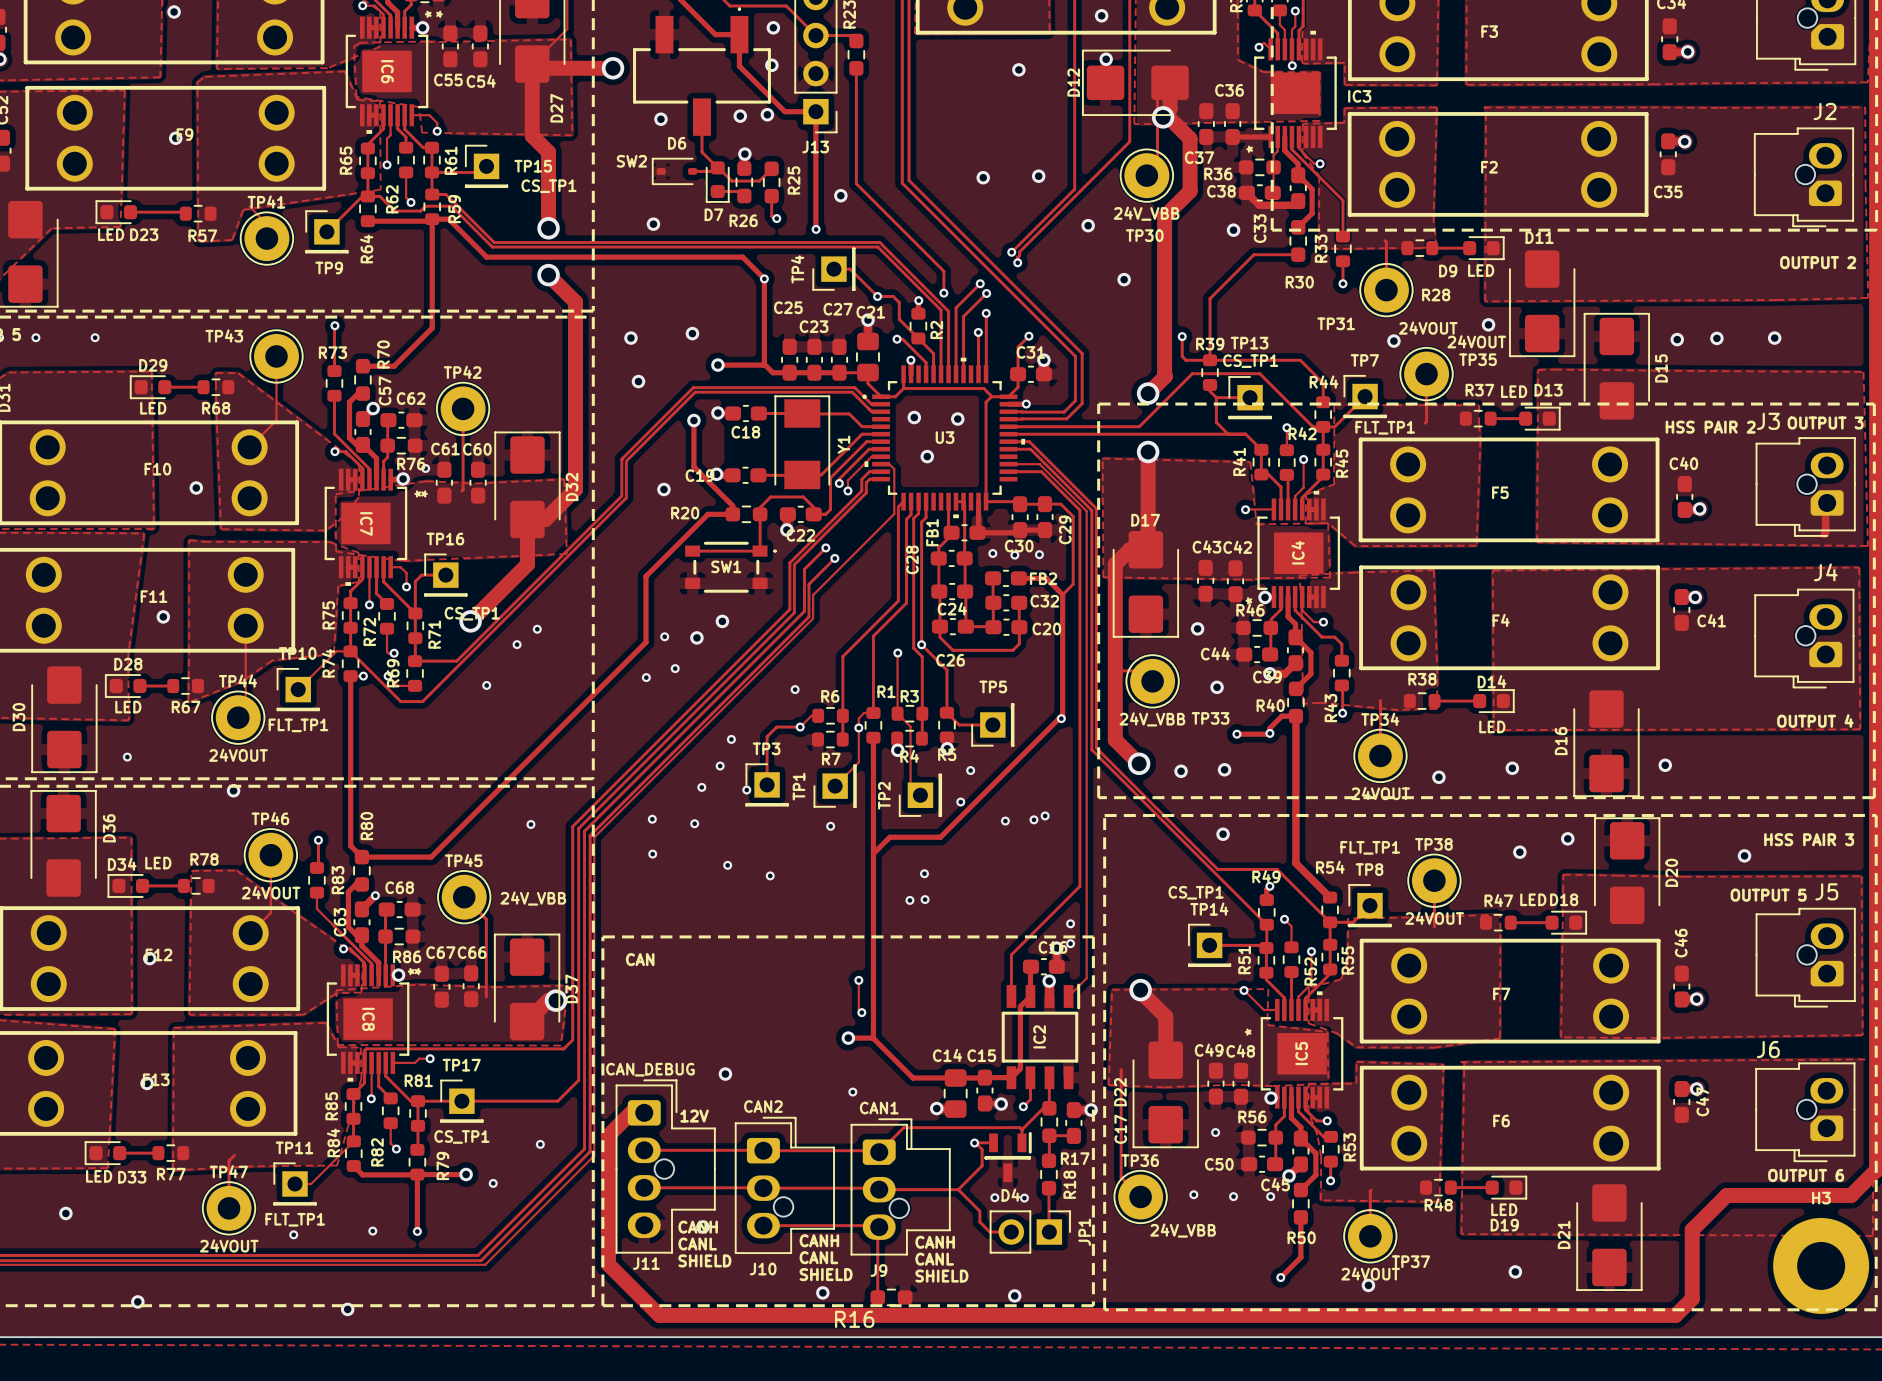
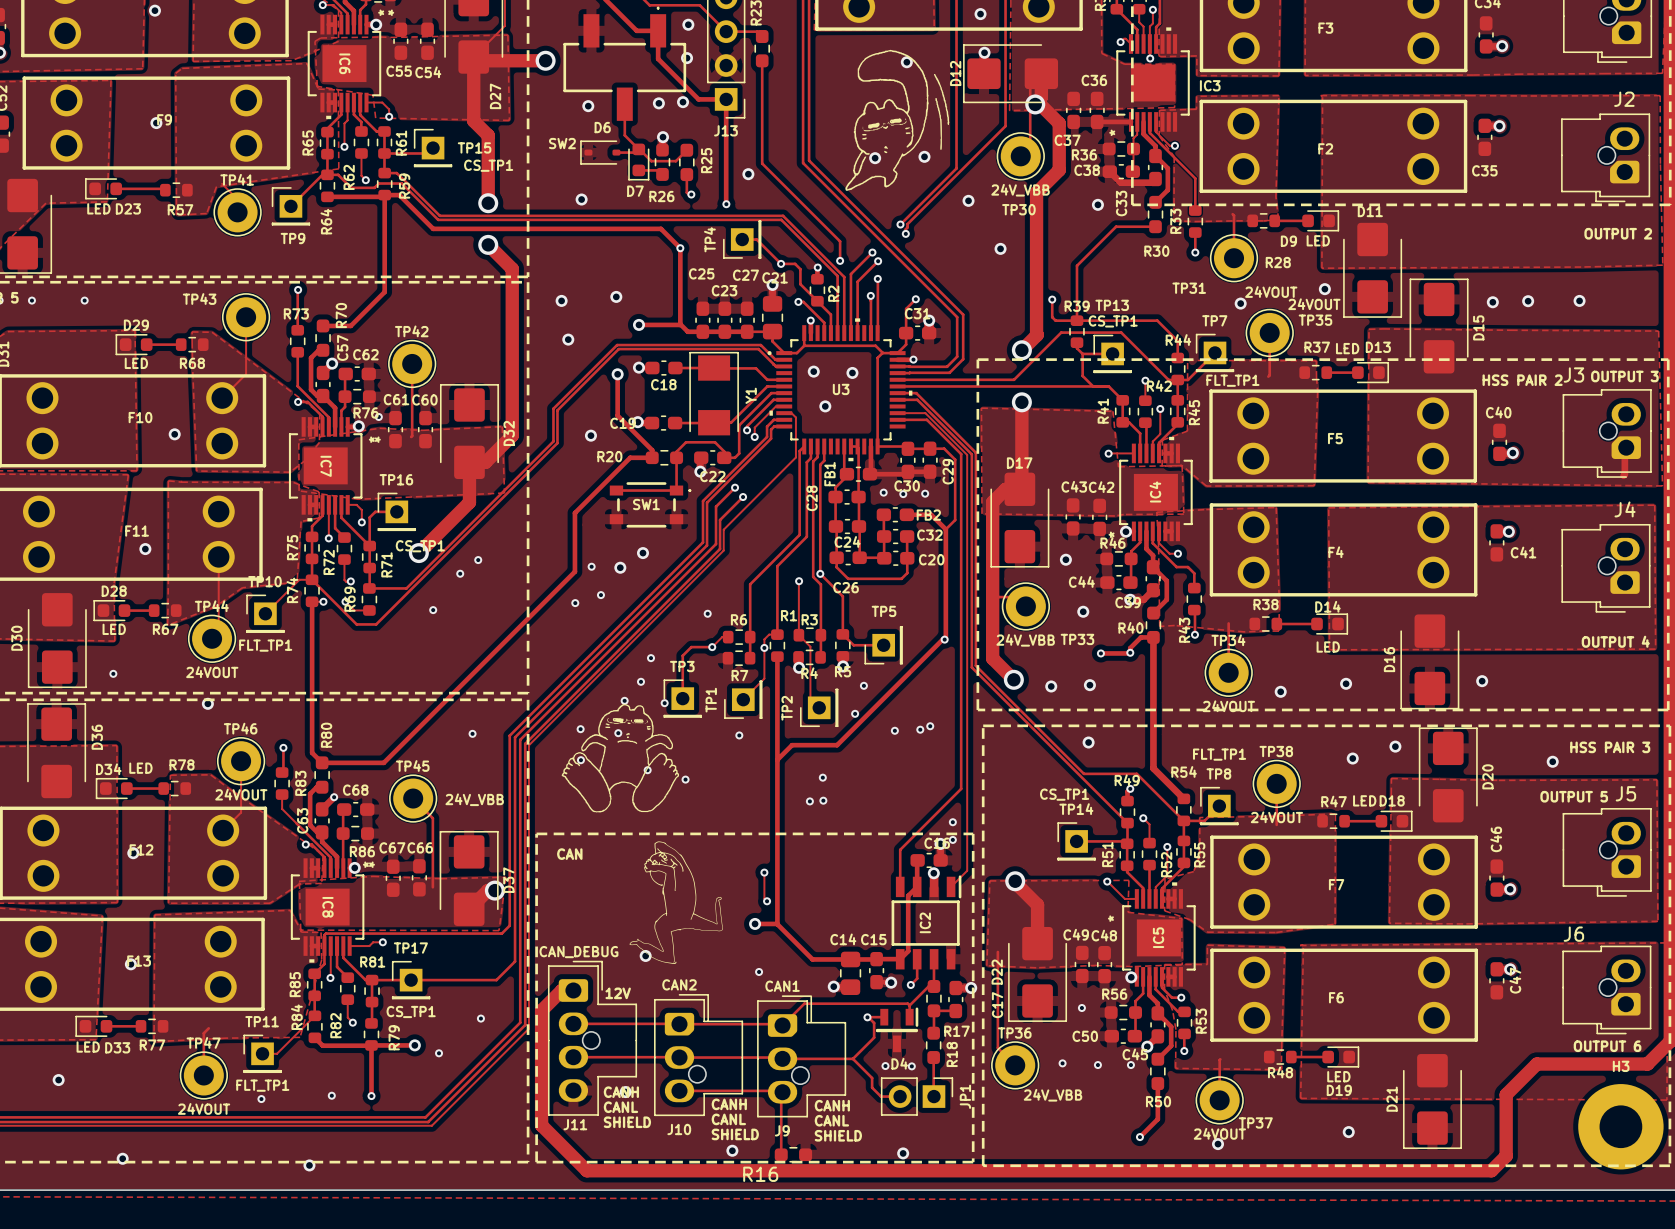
drawing: none -> [845, 49, 950, 191]
drawing: none -> [561, 704, 680, 813]
drawing: none -> [629, 841, 723, 965]

